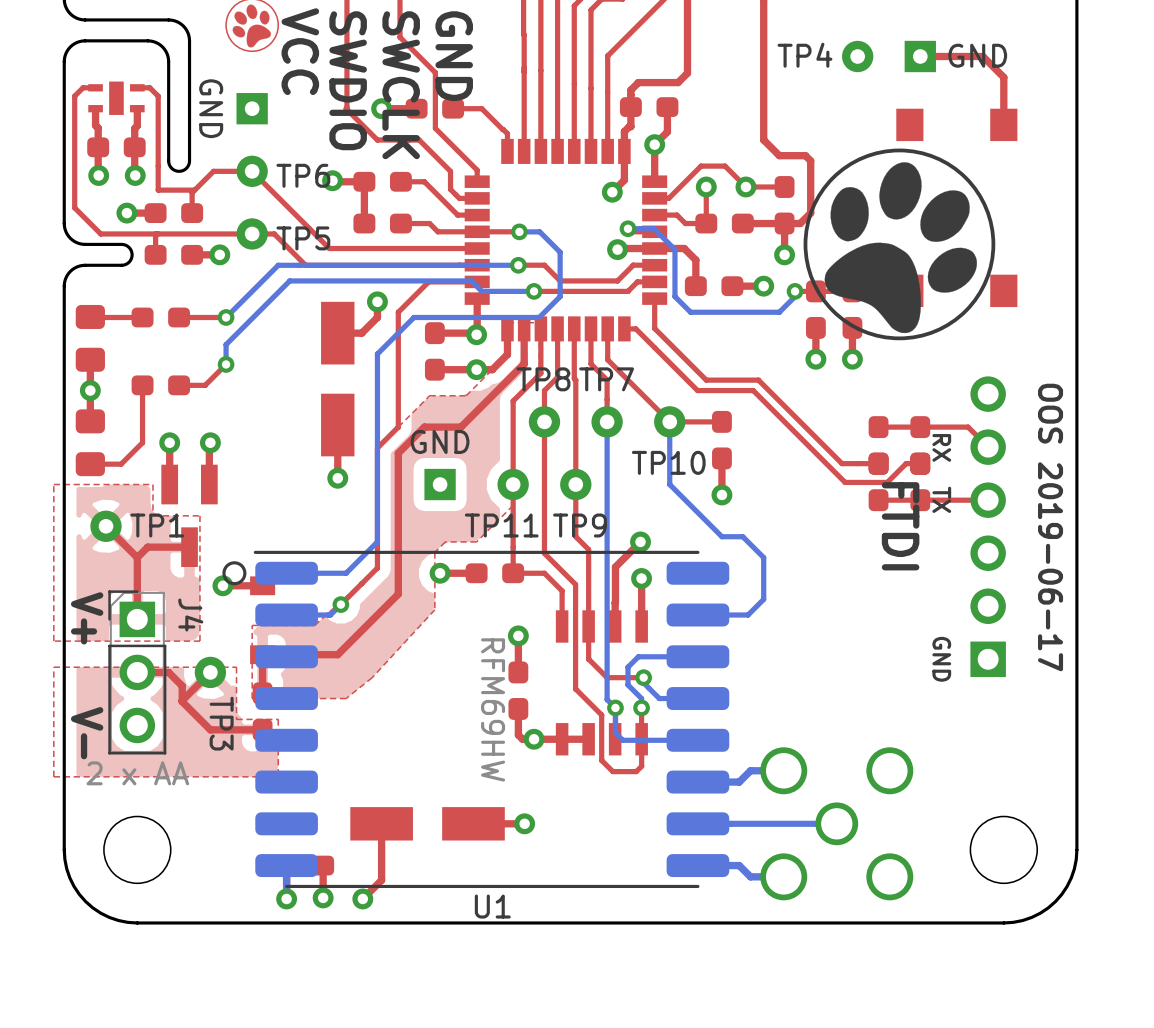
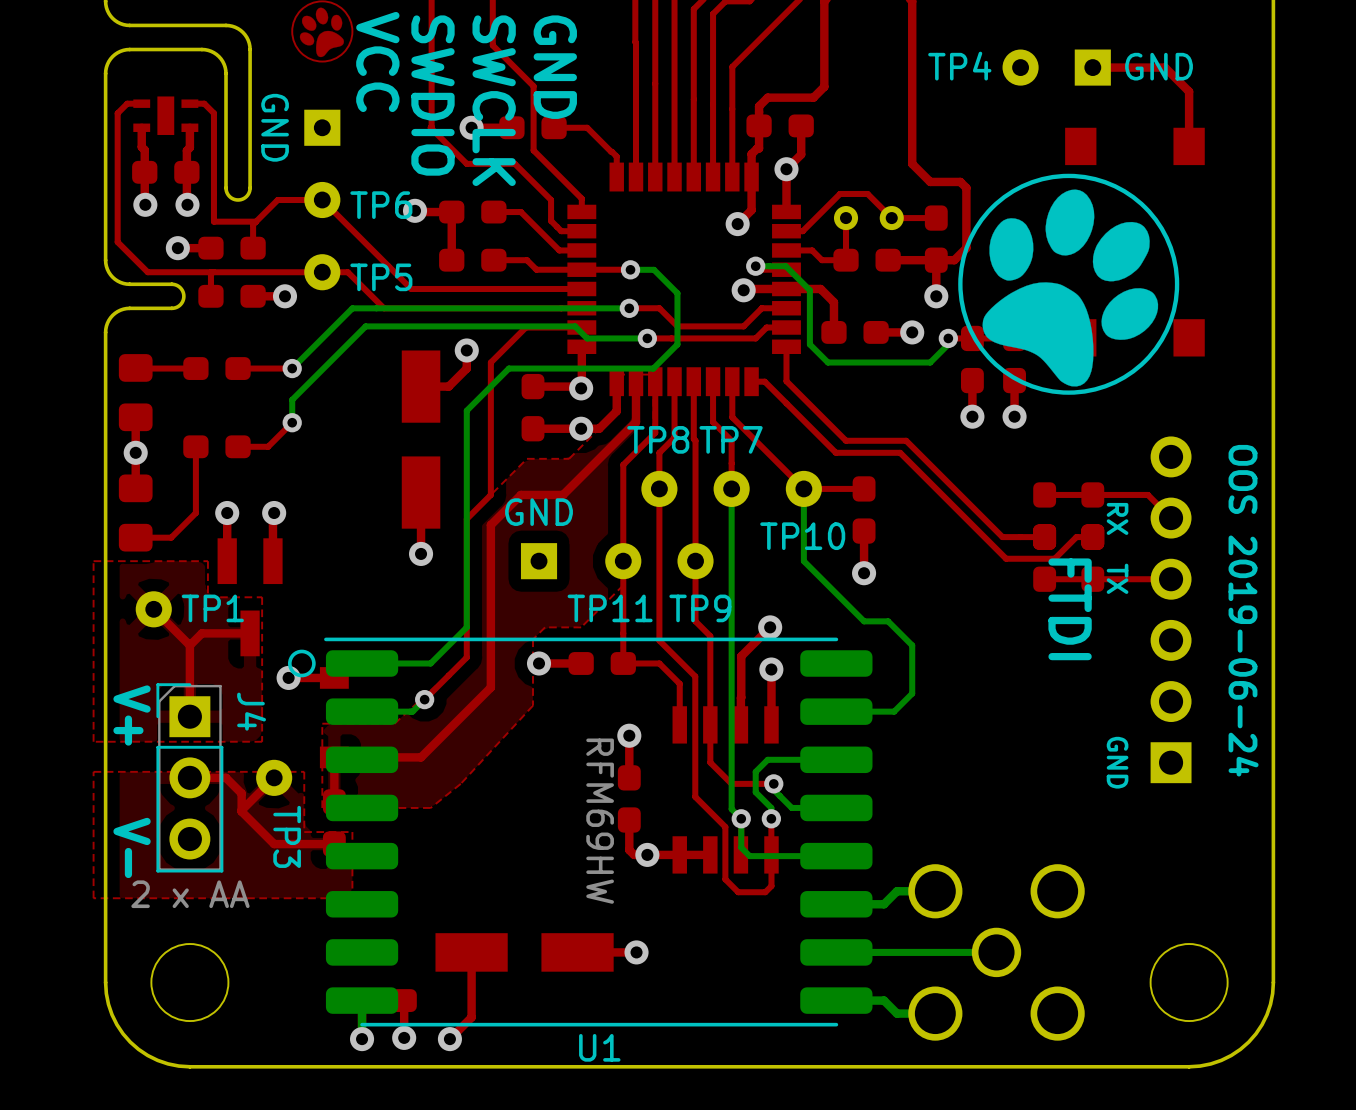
text: OOS 2019-06-17 (1050, 527) -> OOS 2019-06-24 (1243, 610)

